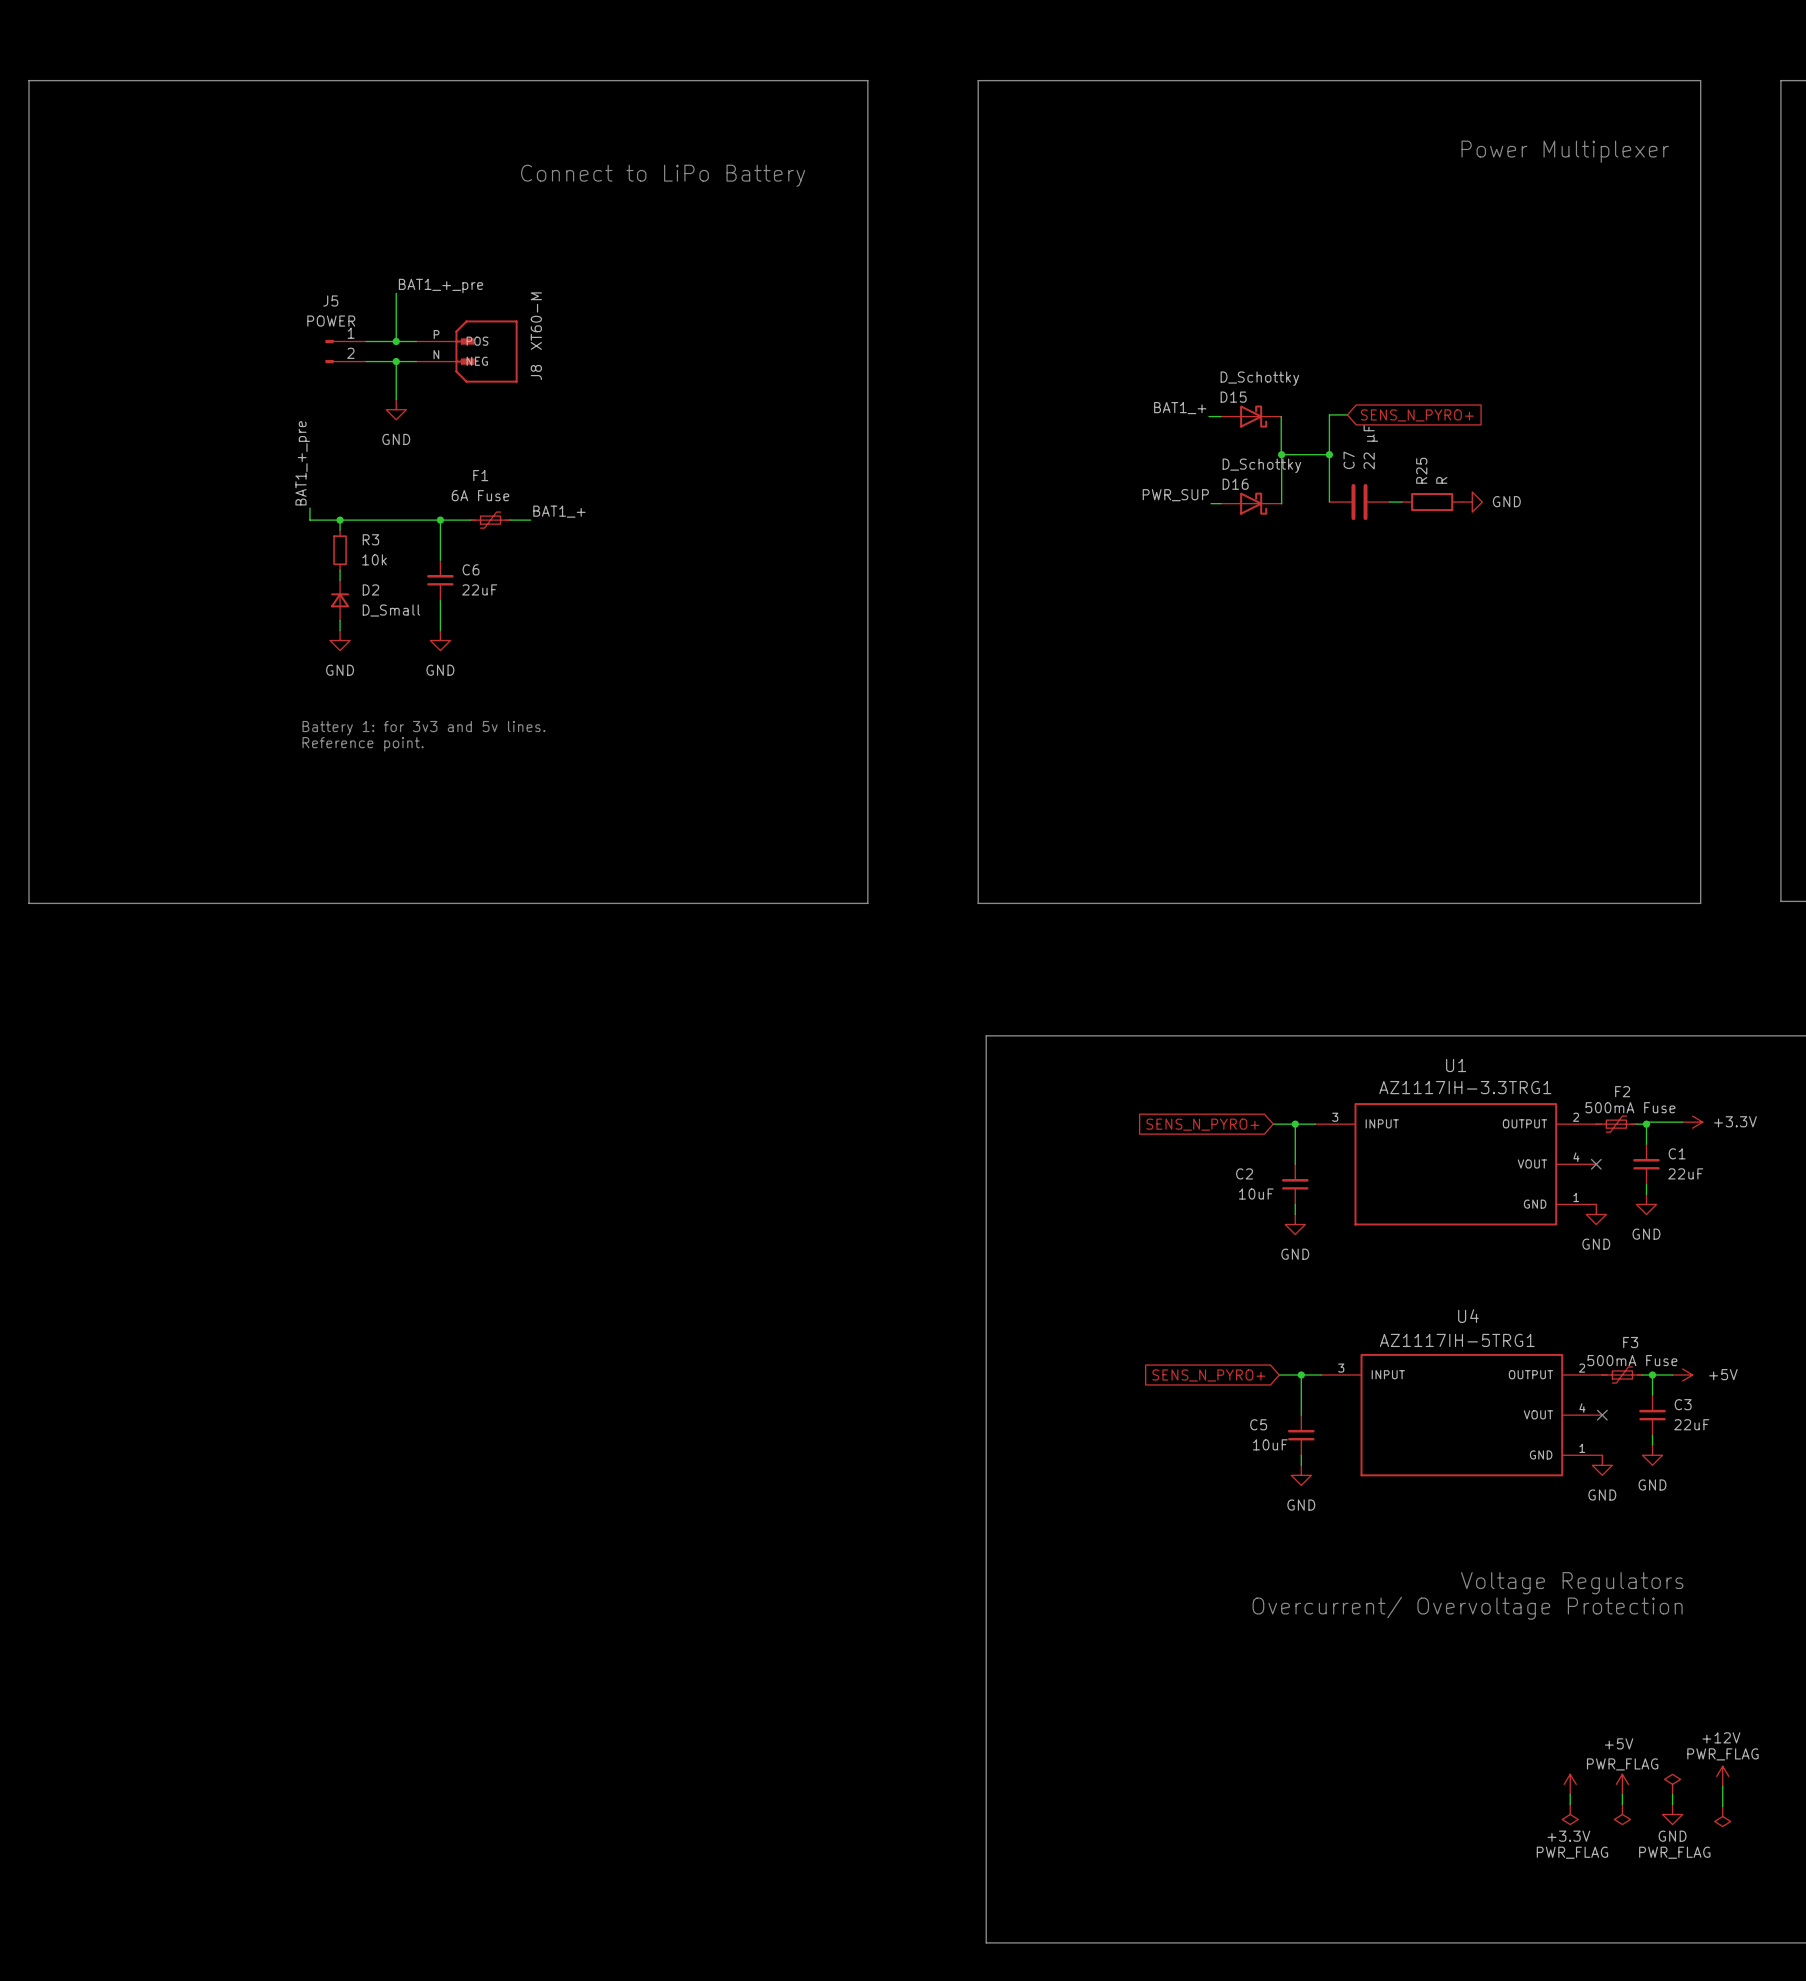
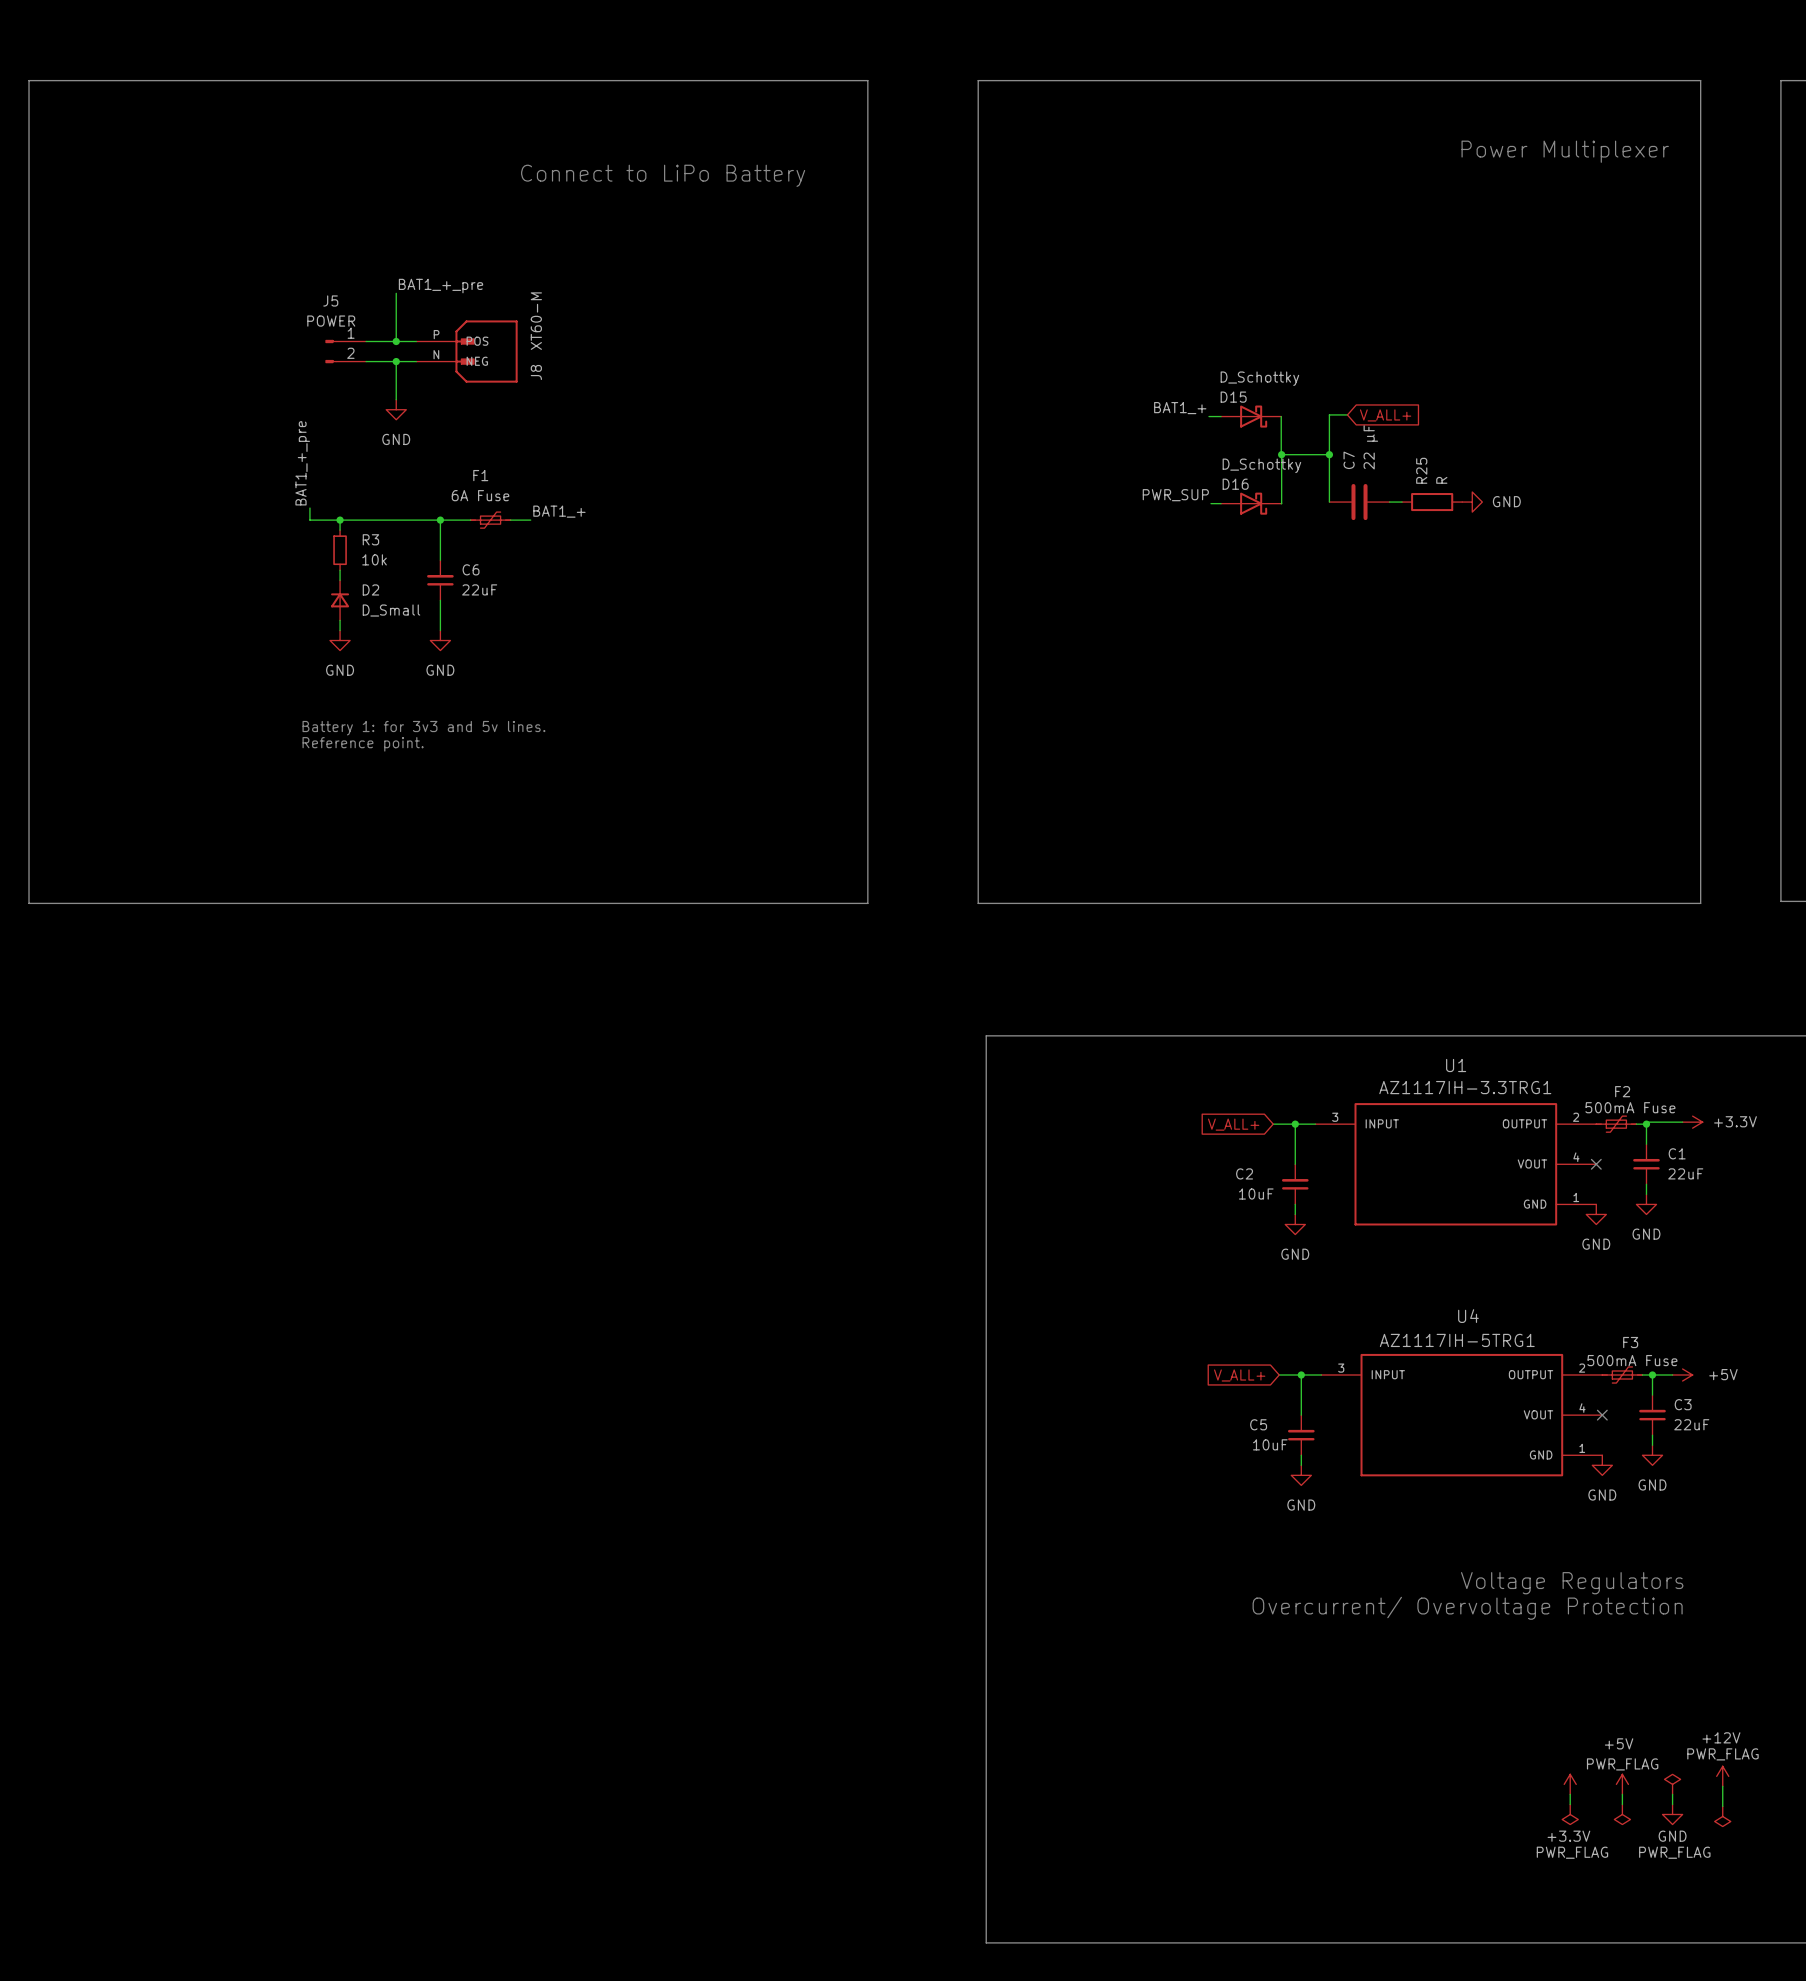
global label: SENS_N_PYRO+ (1417, 415) -> V_ALL+ (1385, 415)
global label: SENS_N_PYRO+ (1202, 1124) -> V_ALL+ (1233, 1124)
global label: SENS_N_PYRO+ (1208, 1375) -> V_ALL+ (1239, 1375)

